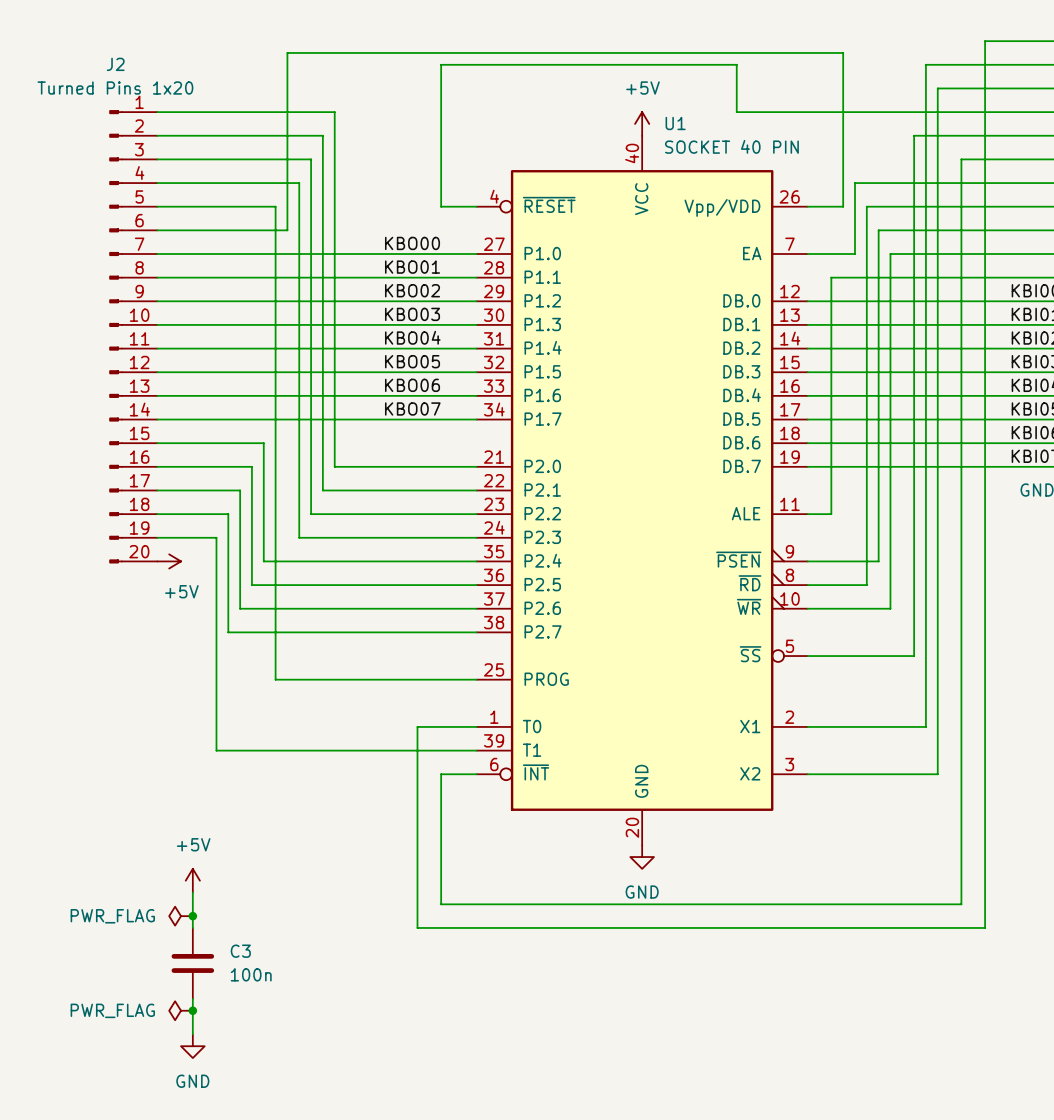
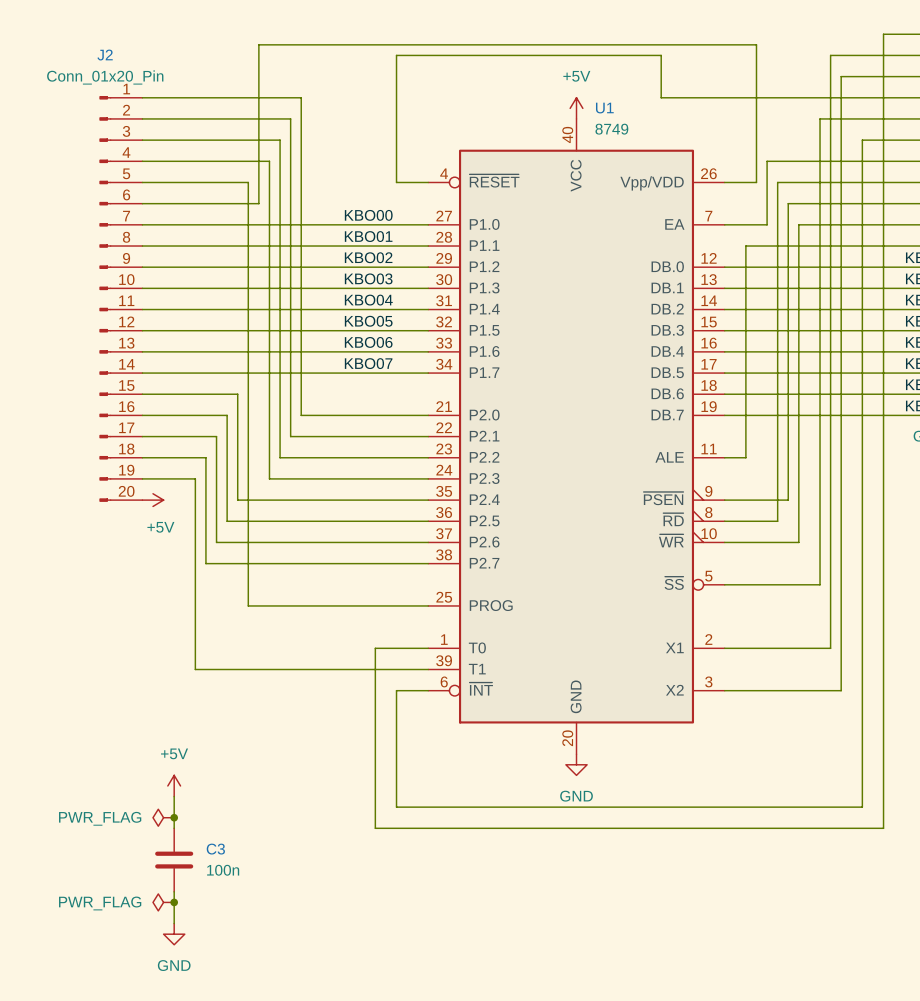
J2 value: Turned Pins 1x20 (115, 88) -> Conn_01x20_Pin (105, 77)
U1 value: SOCKET 40 PIN (731, 146) -> 8749 (611, 129)

